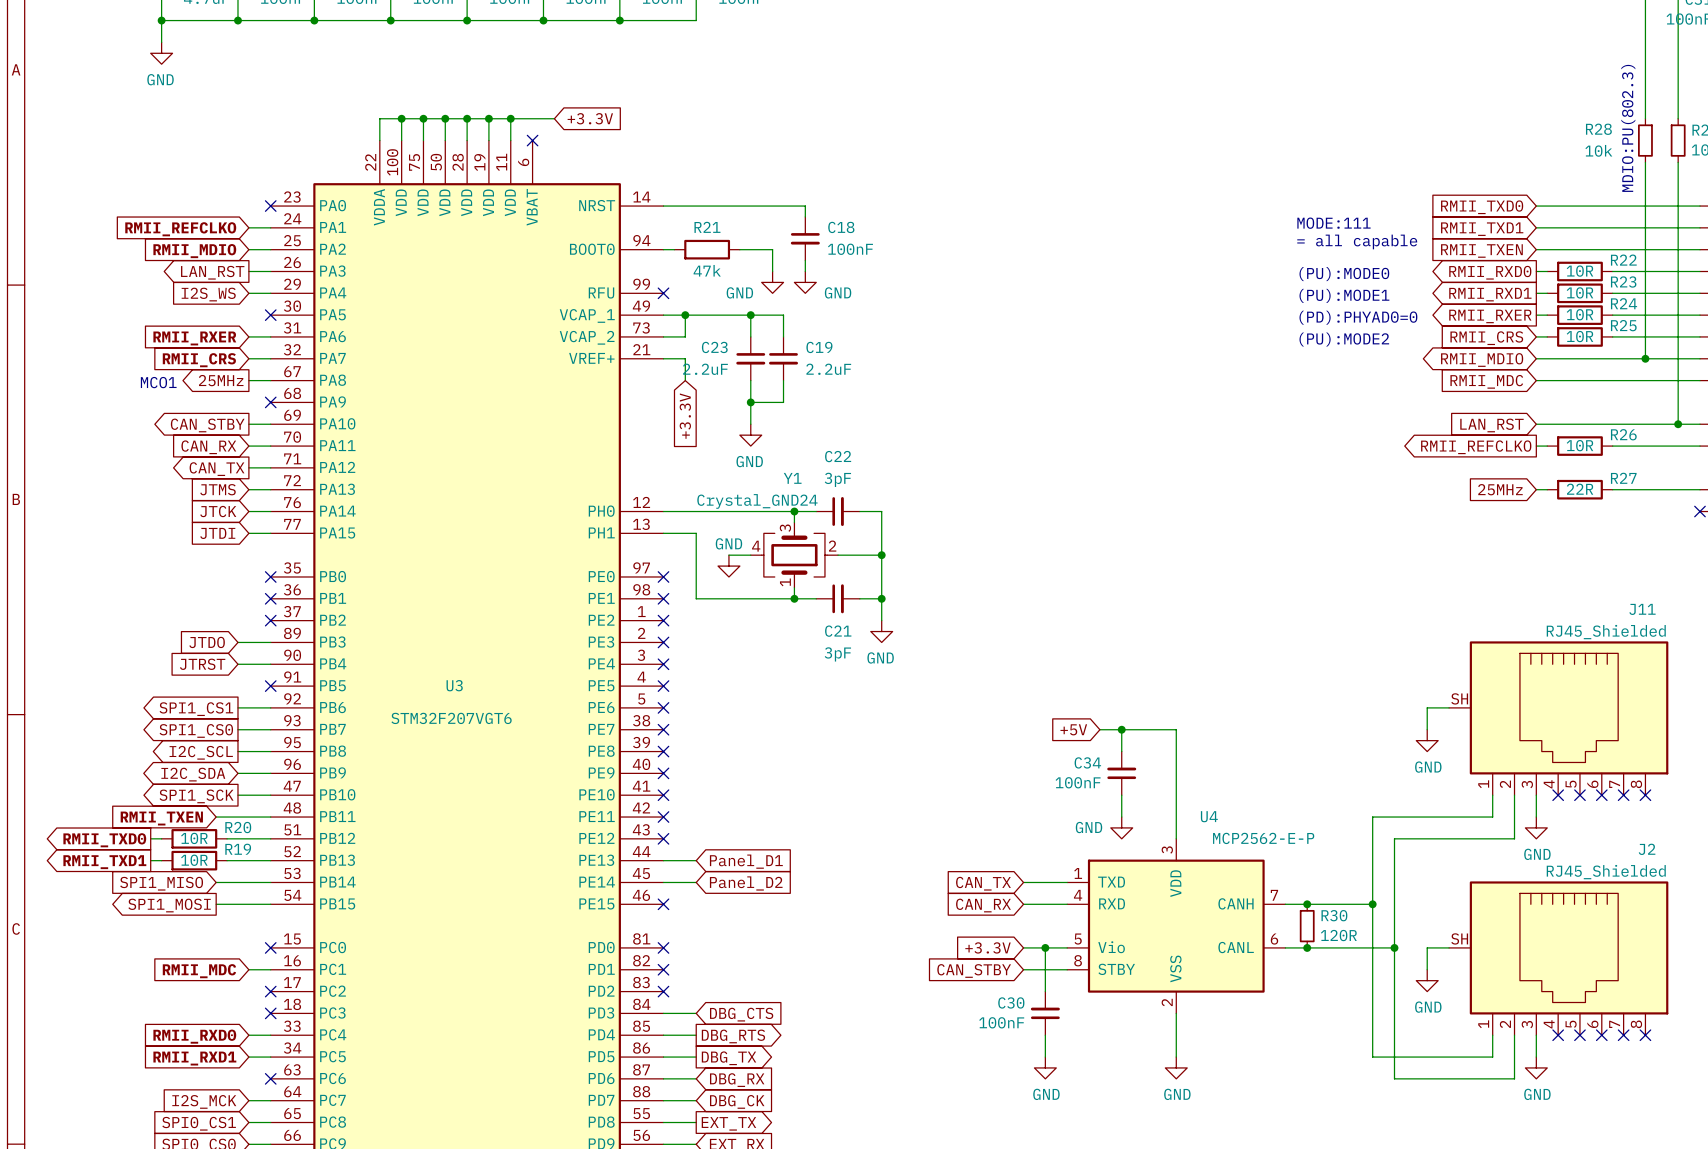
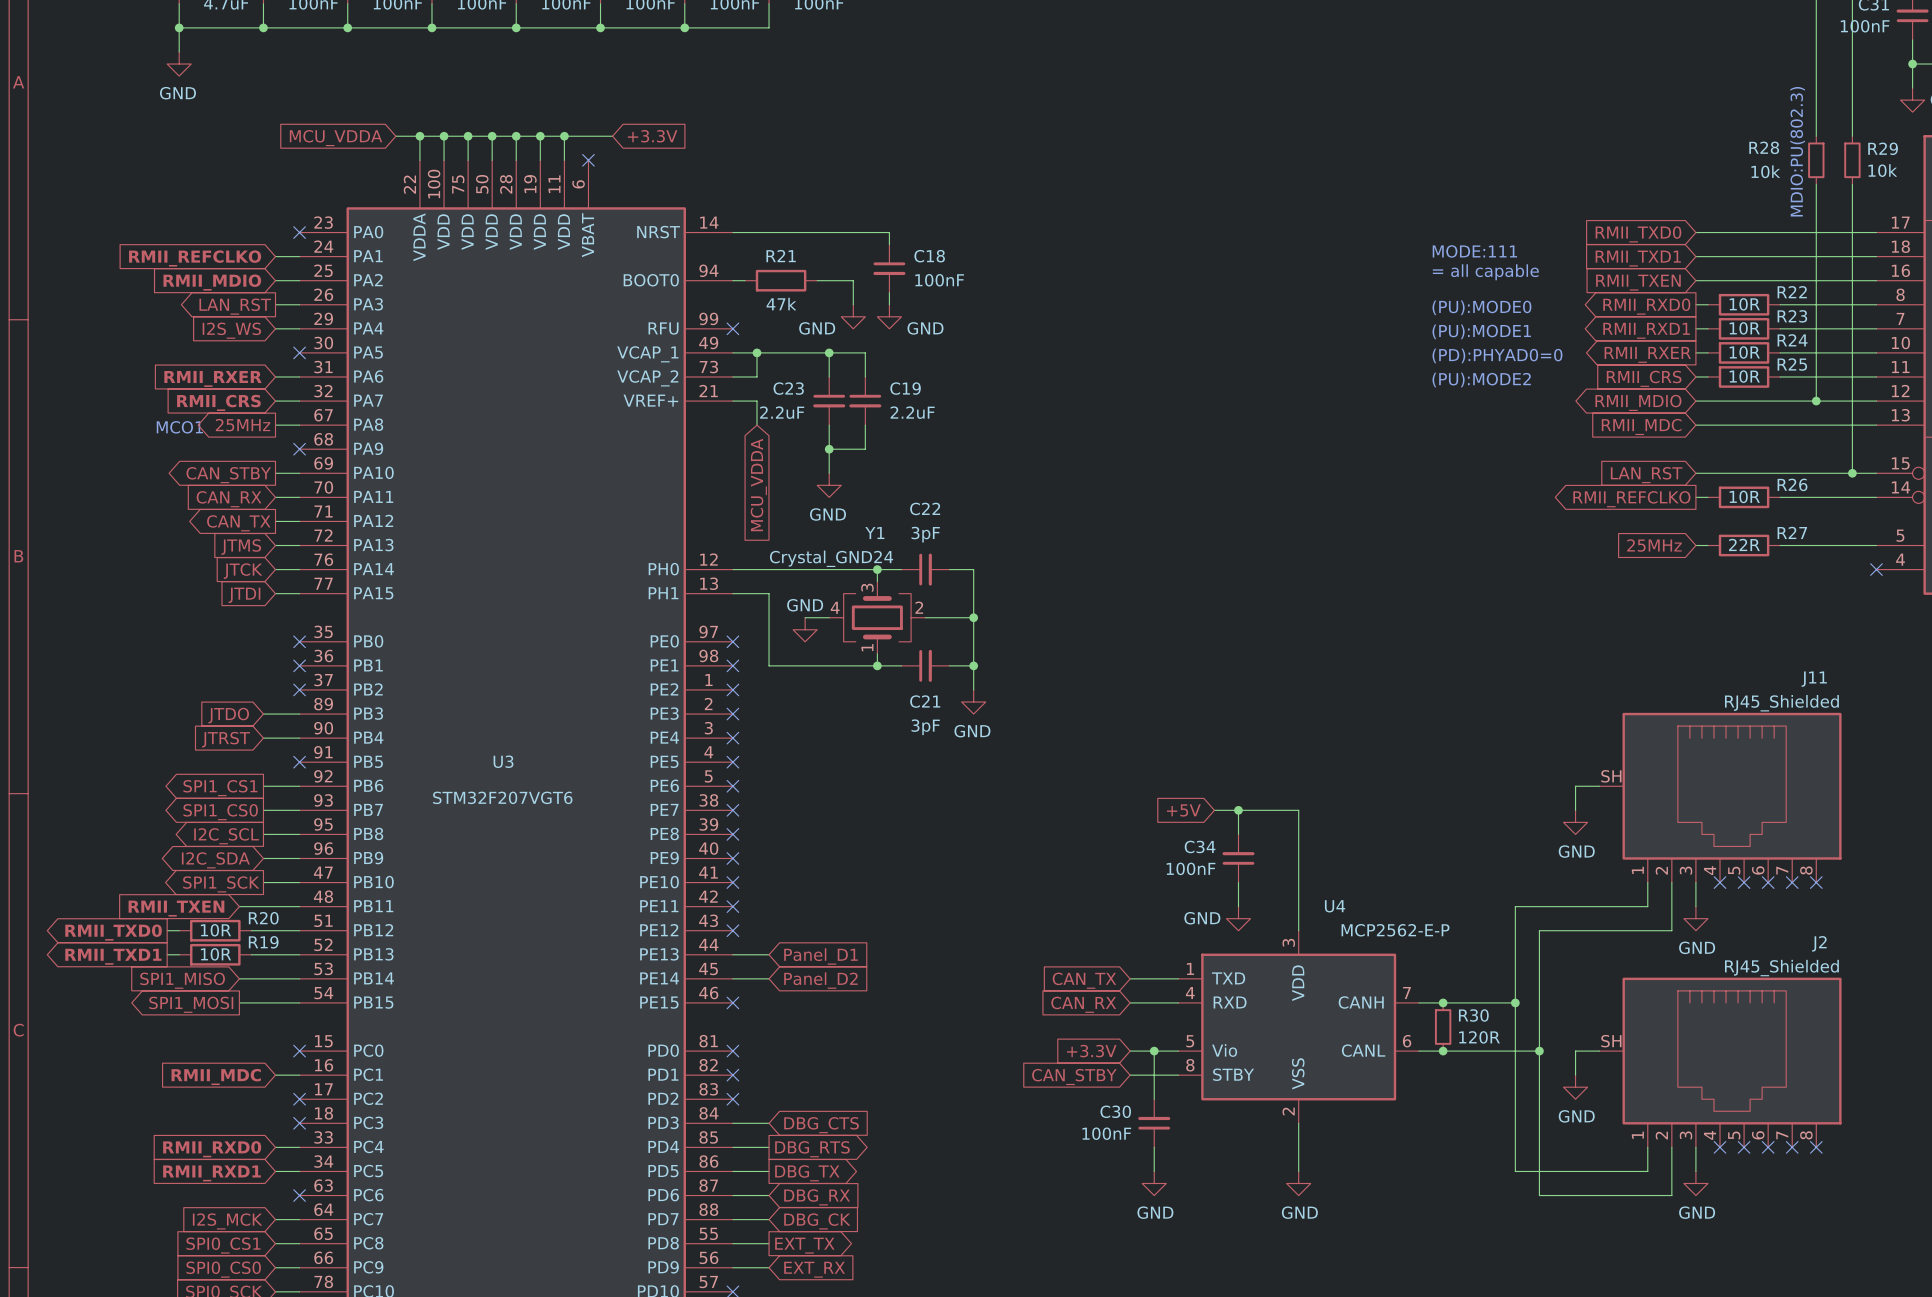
wire: none -> (395, 136) (419, 136)
junction: none -> (419, 136)
global label: none -> MCU_VDDA (336, 138)
global label: +3.3V (685, 416) -> MCU_VDDA (758, 485)

